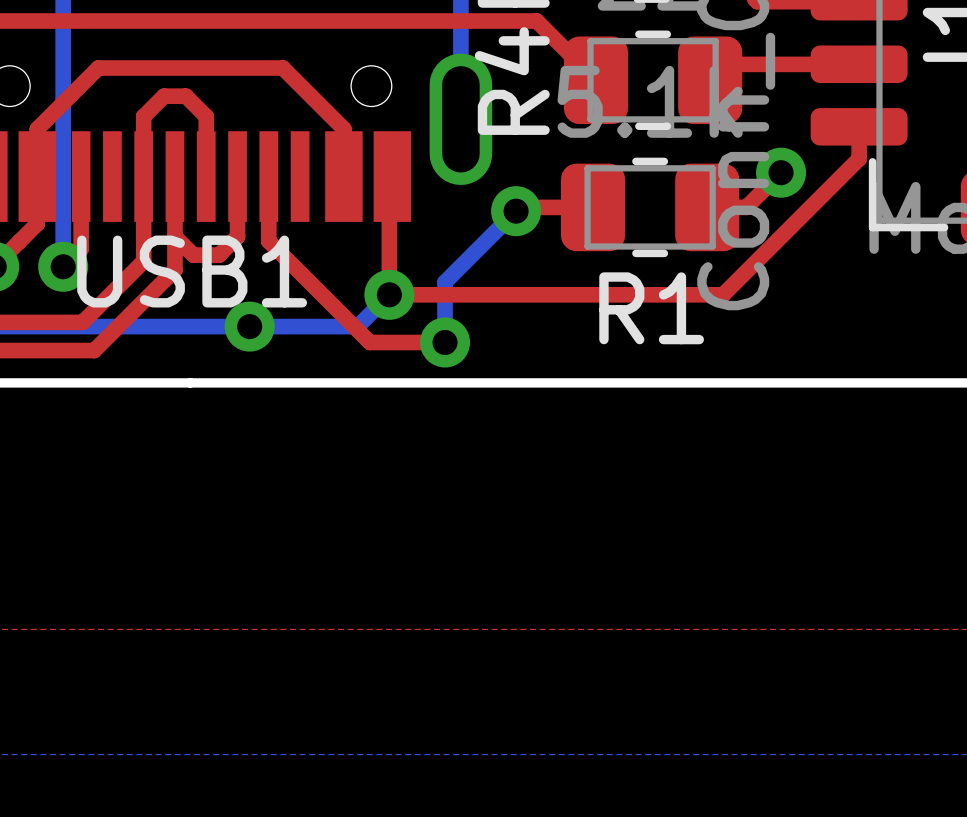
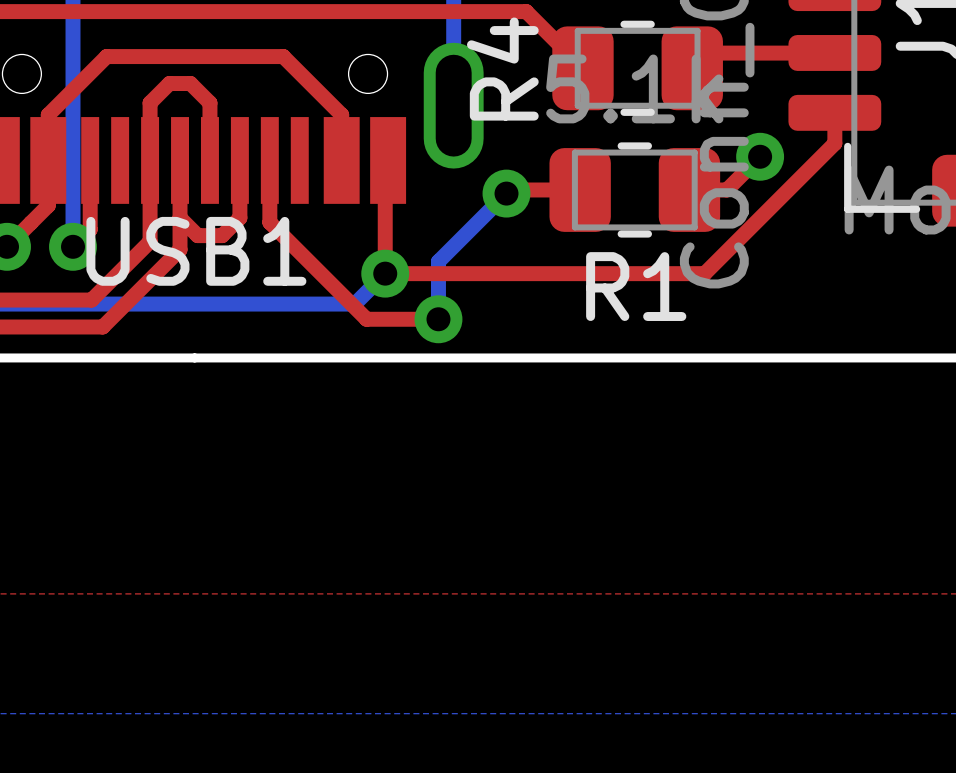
via: (249, 326) -> none

